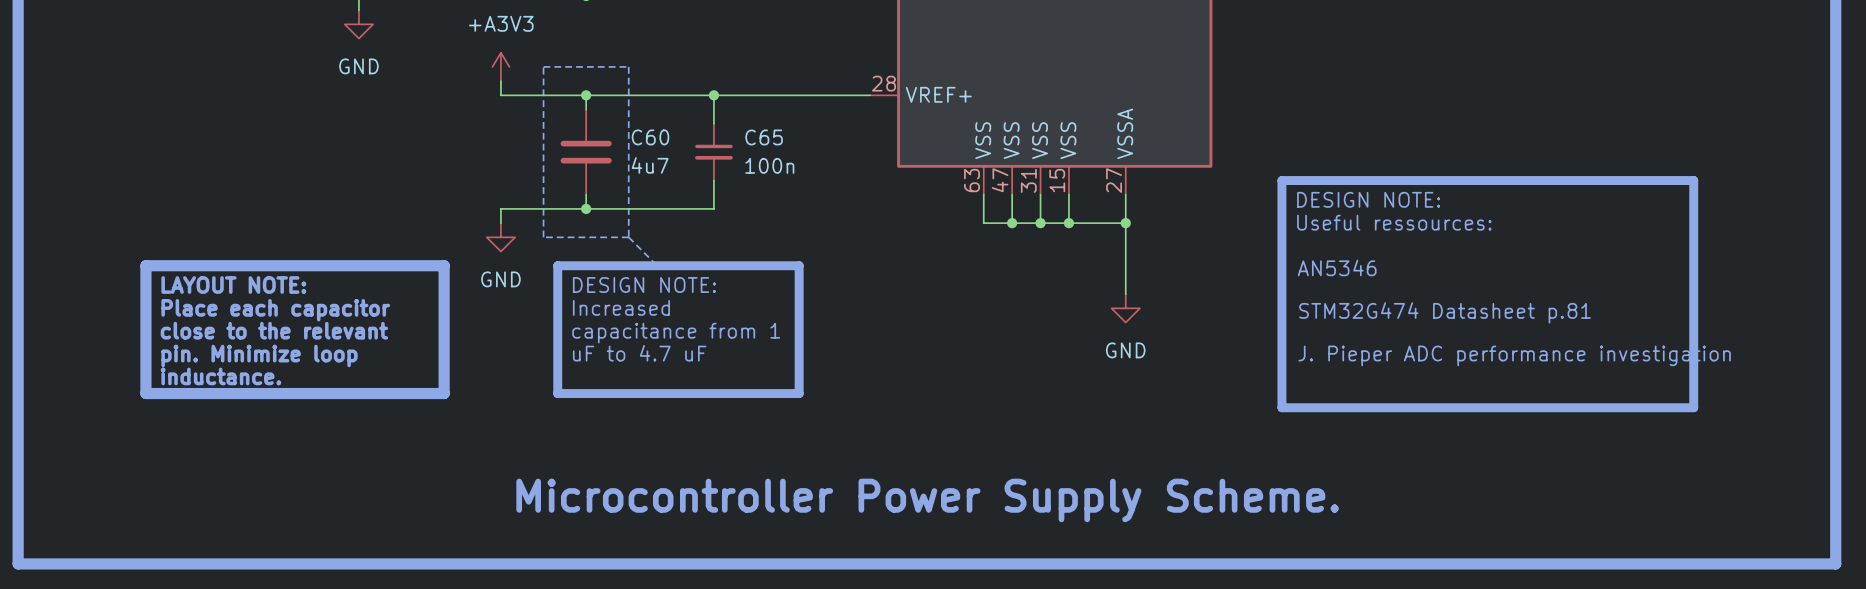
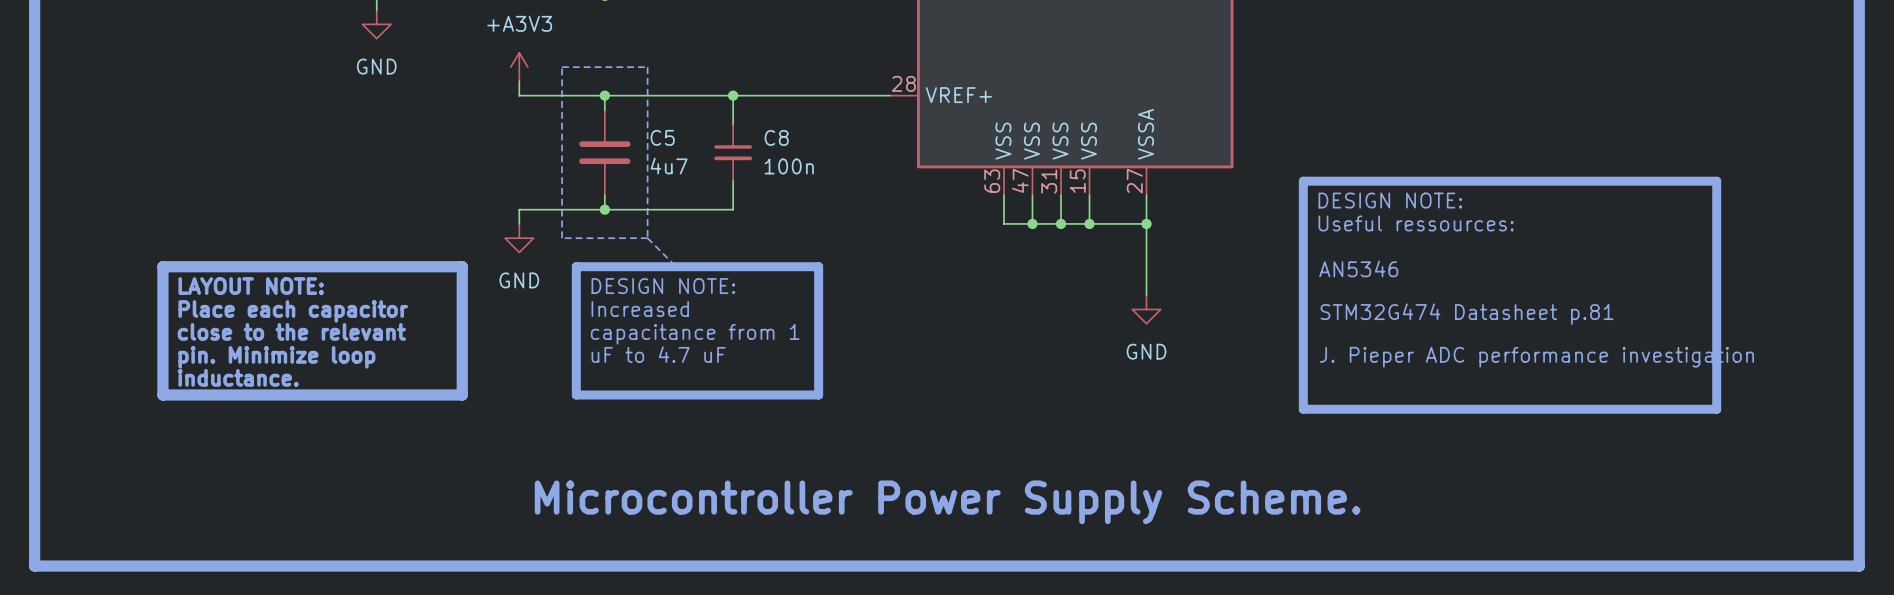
C60 name: C60 (650, 137) -> C5 (662, 137)
C65 name: C65 (764, 137) -> C8 (776, 137)

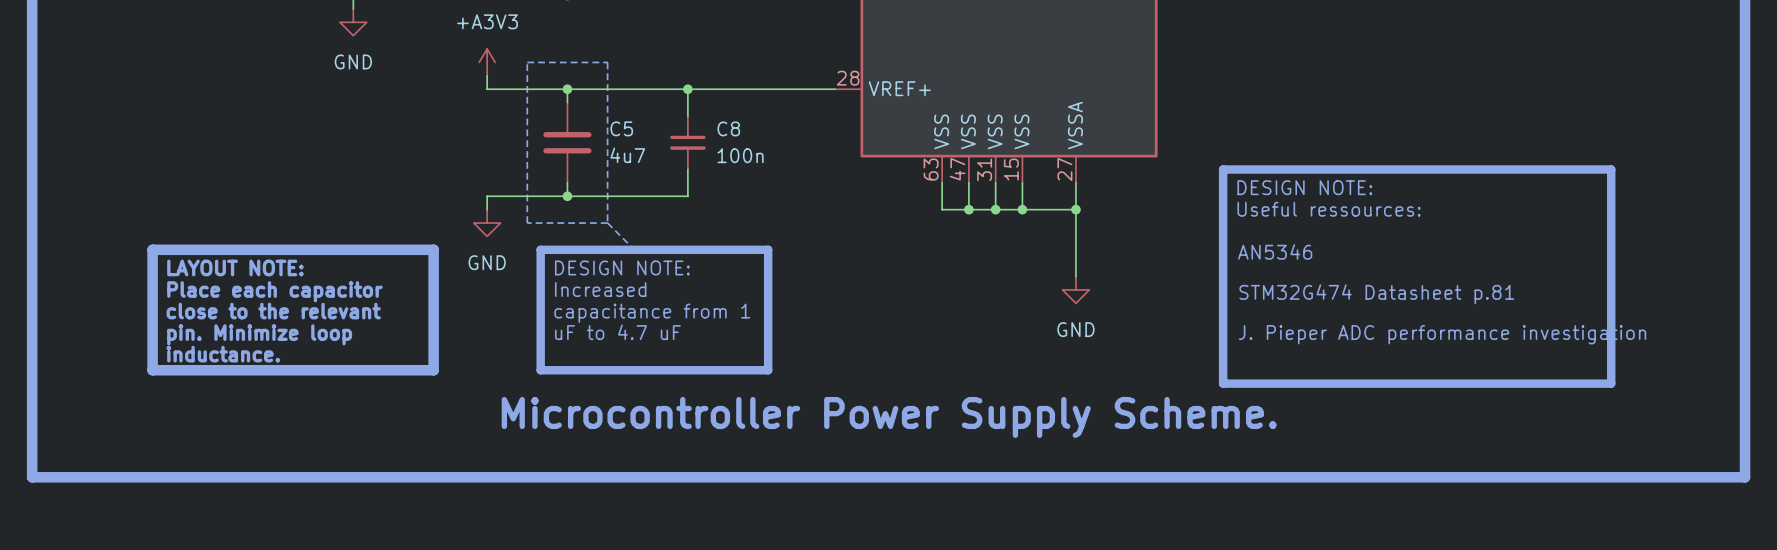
text position: Microcontroller Power Supply Scheme. (947, 502) -> Microcontroller Power Supply Scheme. (889, 417)
line: (34, 509) (34, 566) (1859, 566) (1859, 509) -> (32, 477) (1745, 477)

